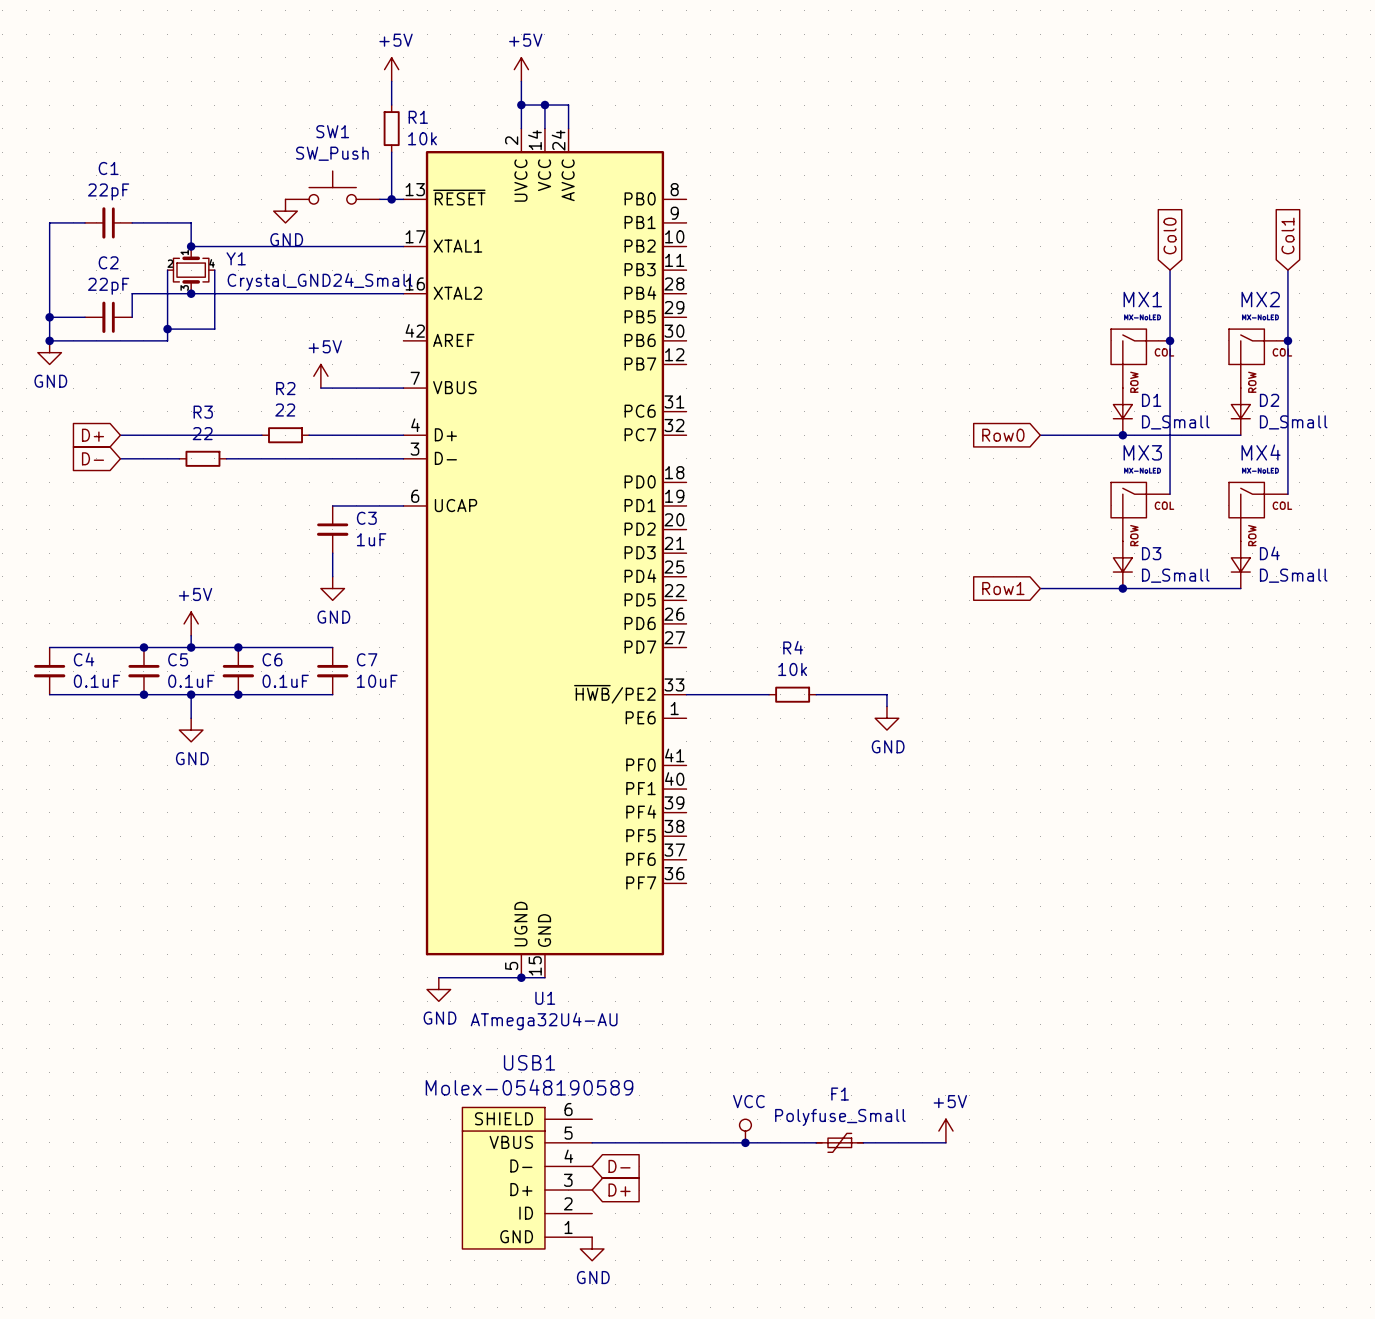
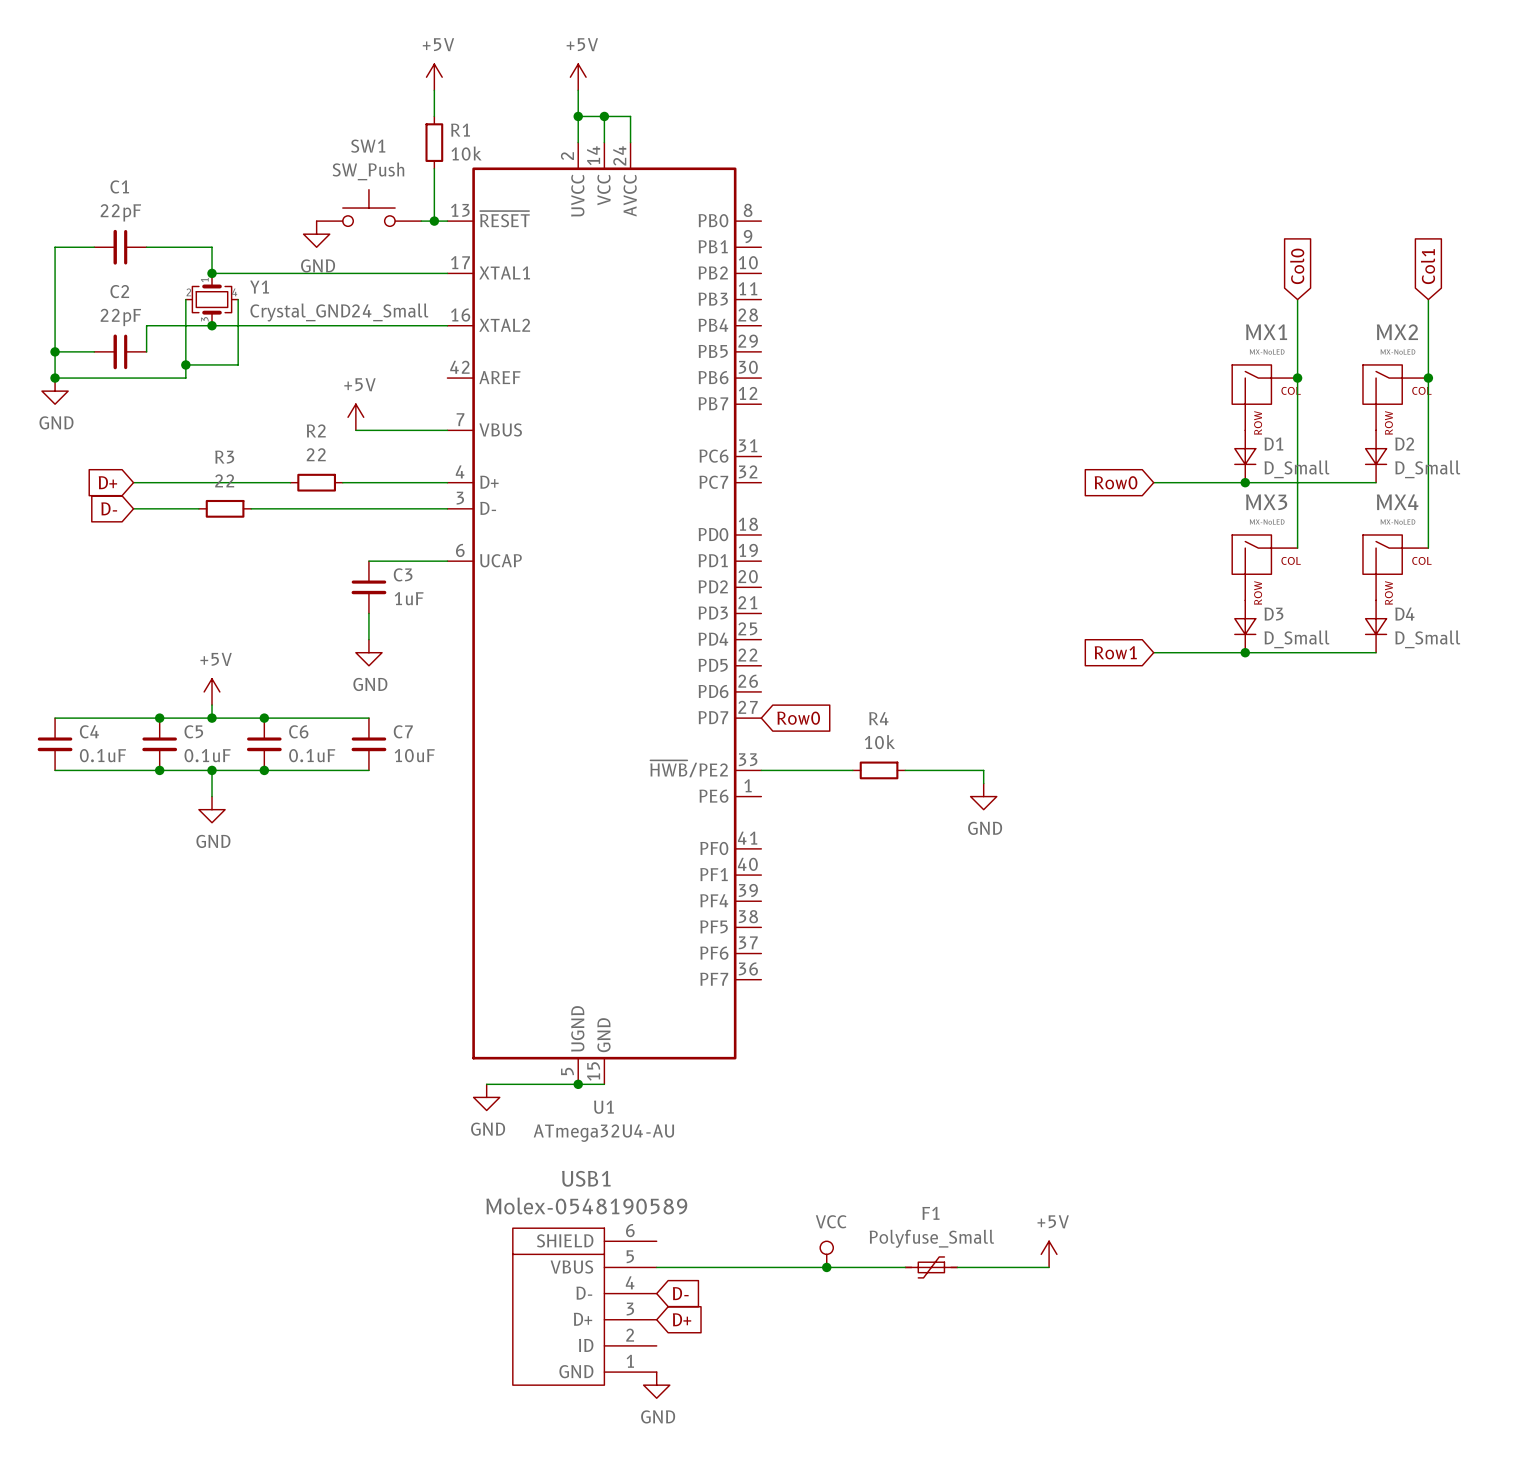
global label: none -> Row0 (798, 718)

